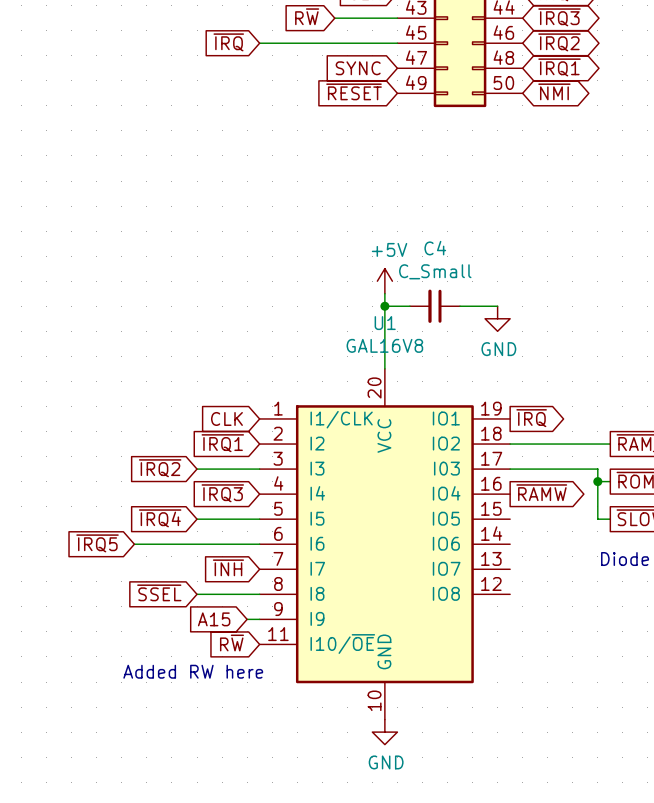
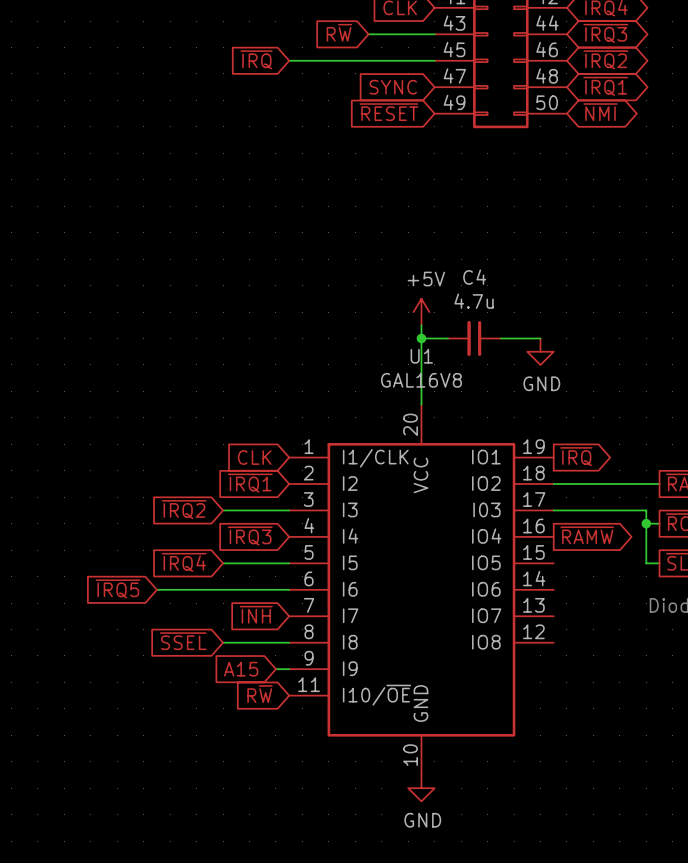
C4 value: C_Small (435, 271) -> 4.7u (474, 301)
text: Added RW here (193, 671) -> none

